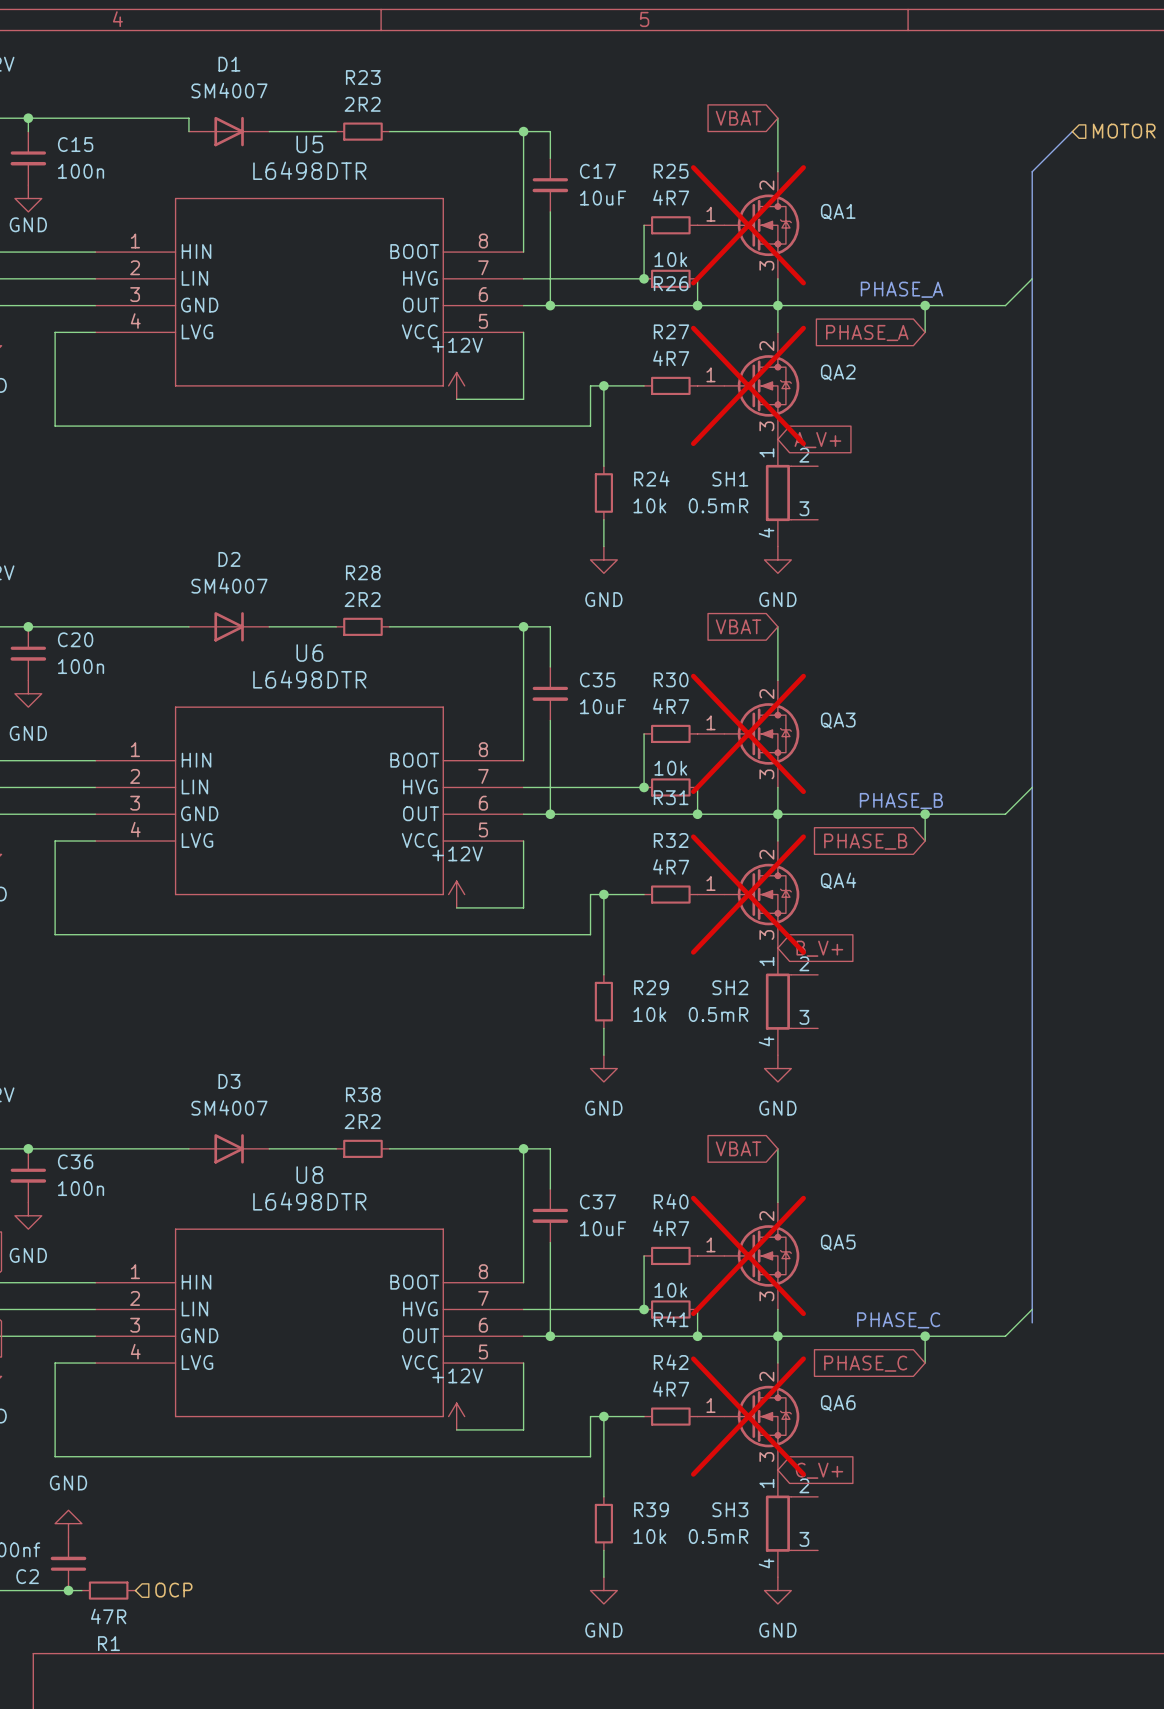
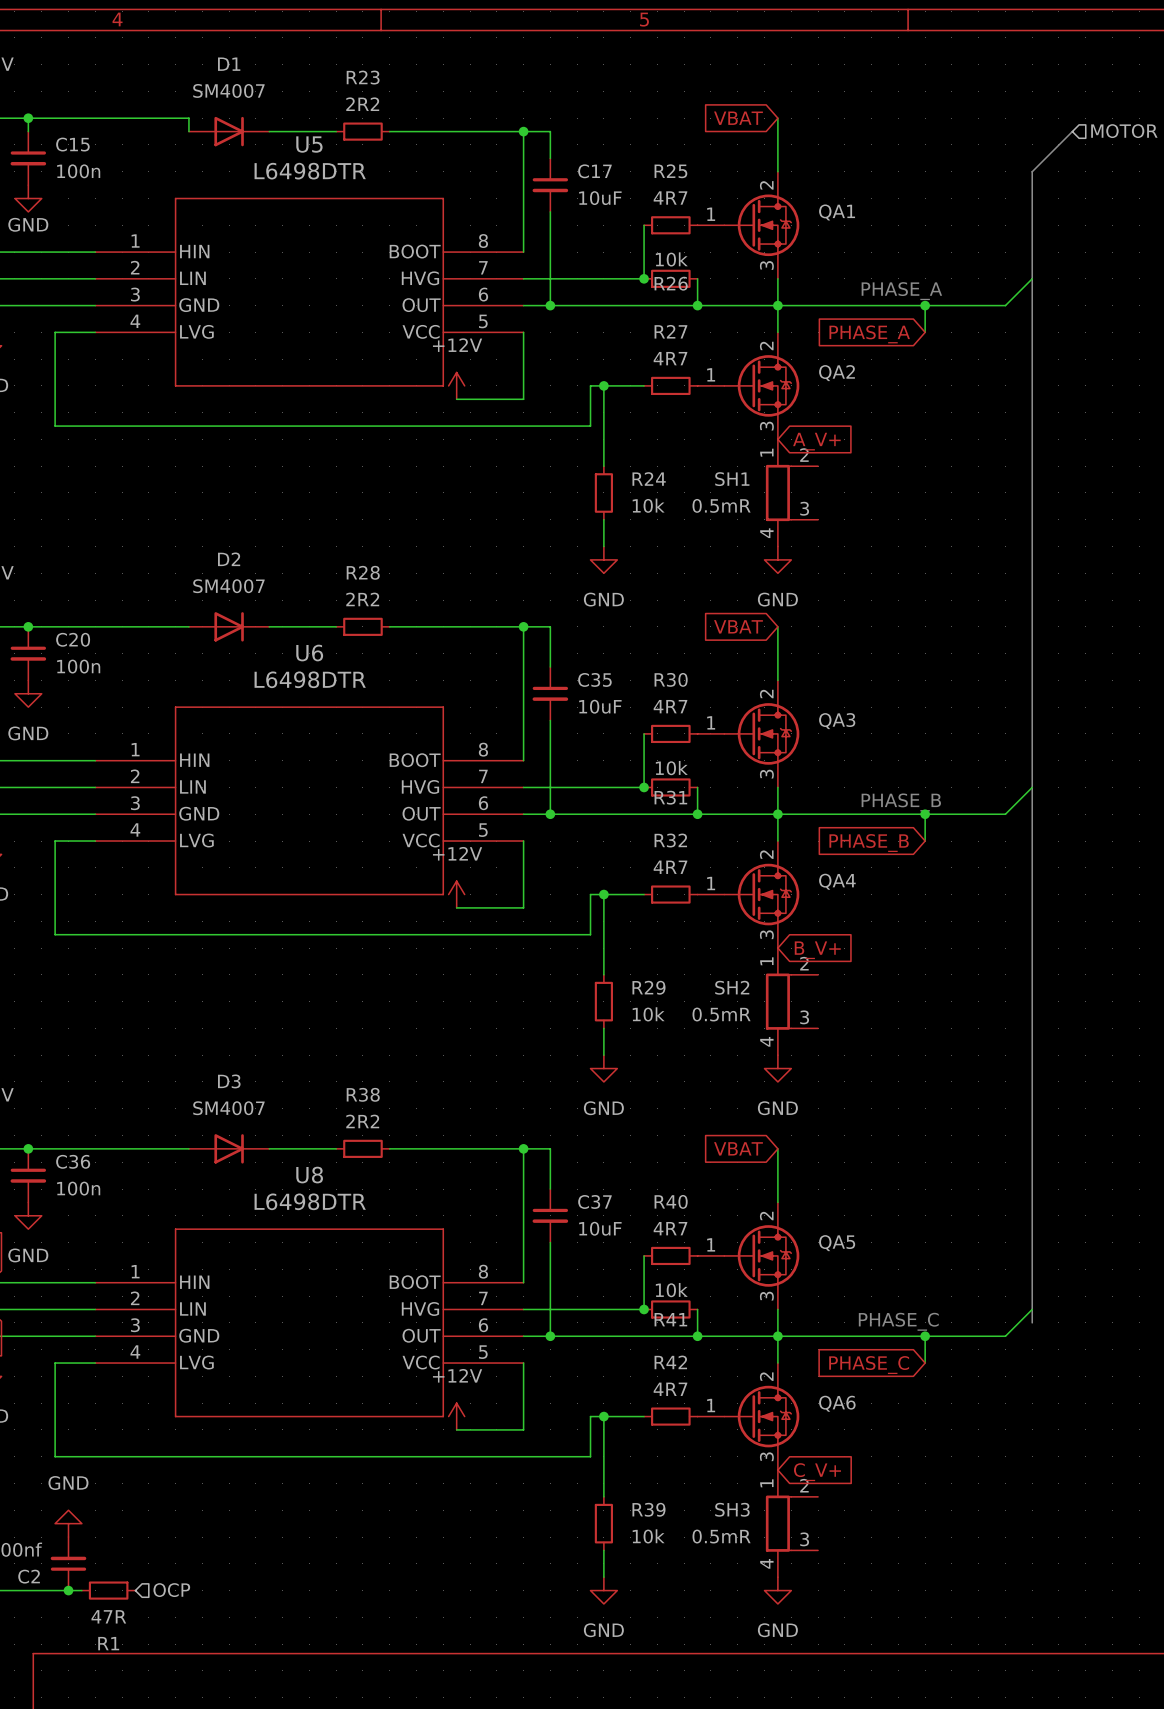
QA1 do-not-place cross: (748, 225) -> none
QA2 do-not-place cross: (748, 385) -> none
QA3 do-not-place cross: (748, 733) -> none
QA4 do-not-place cross: (748, 894) -> none
QA5 do-not-place cross: (748, 1255) -> none
QA6 do-not-place cross: (748, 1416) -> none

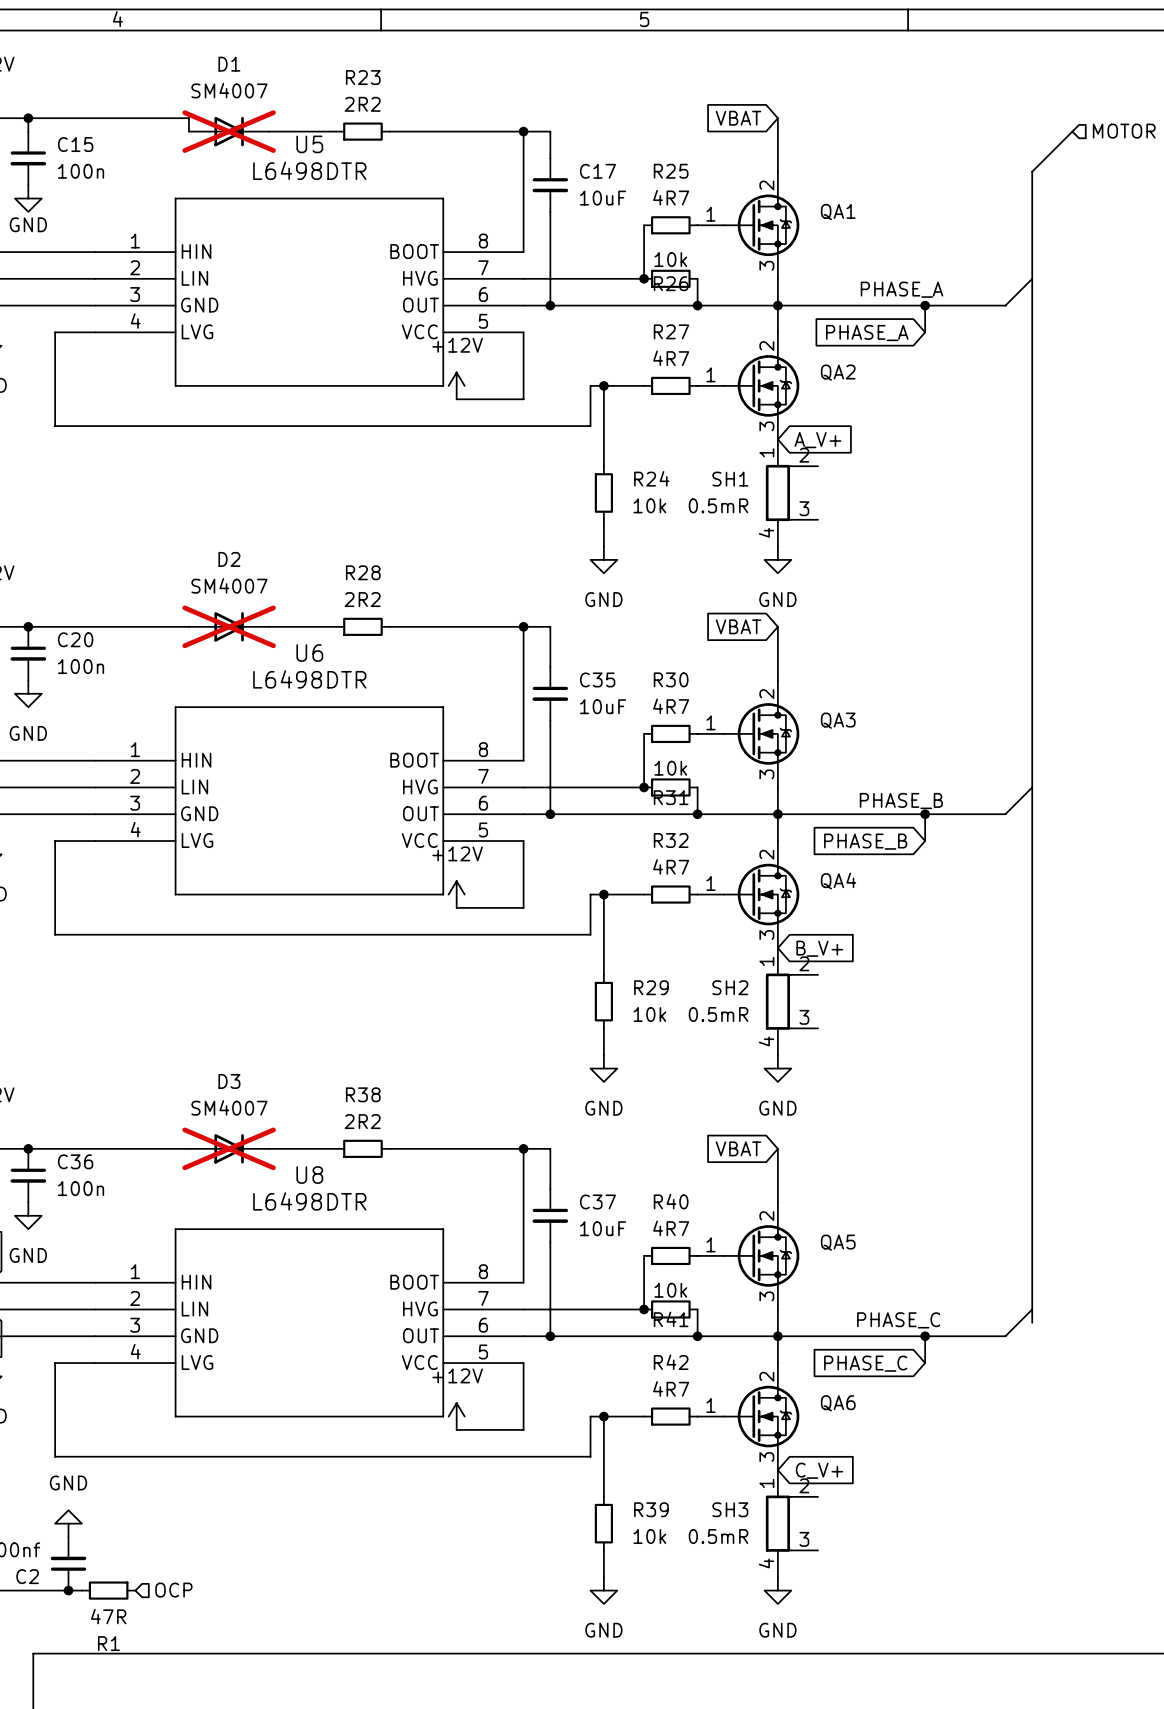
D1 do-not-place cross: none -> (229, 131)
D2 do-not-place cross: none -> (229, 626)
D3 do-not-place cross: none -> (229, 1148)

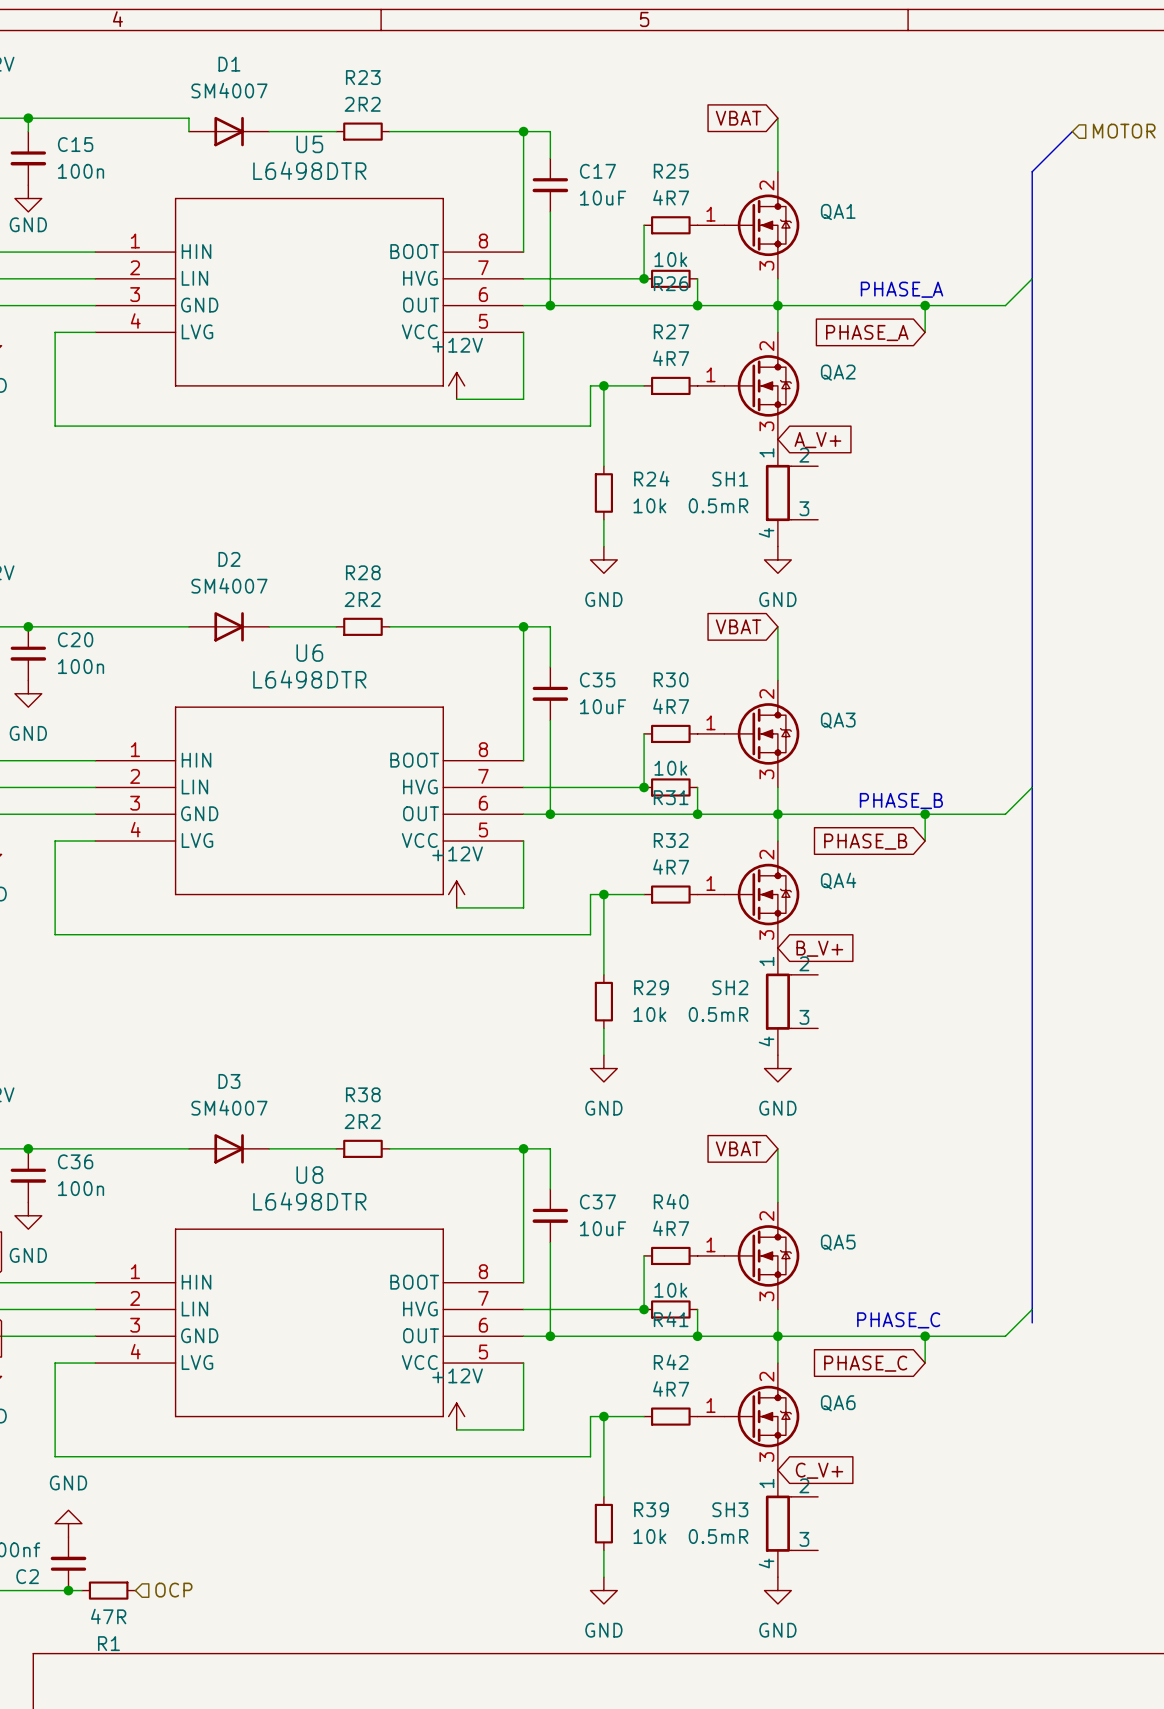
D1 do-not-place cross: (229, 131) -> none
D2 do-not-place cross: (229, 626) -> none
D3 do-not-place cross: (229, 1148) -> none

